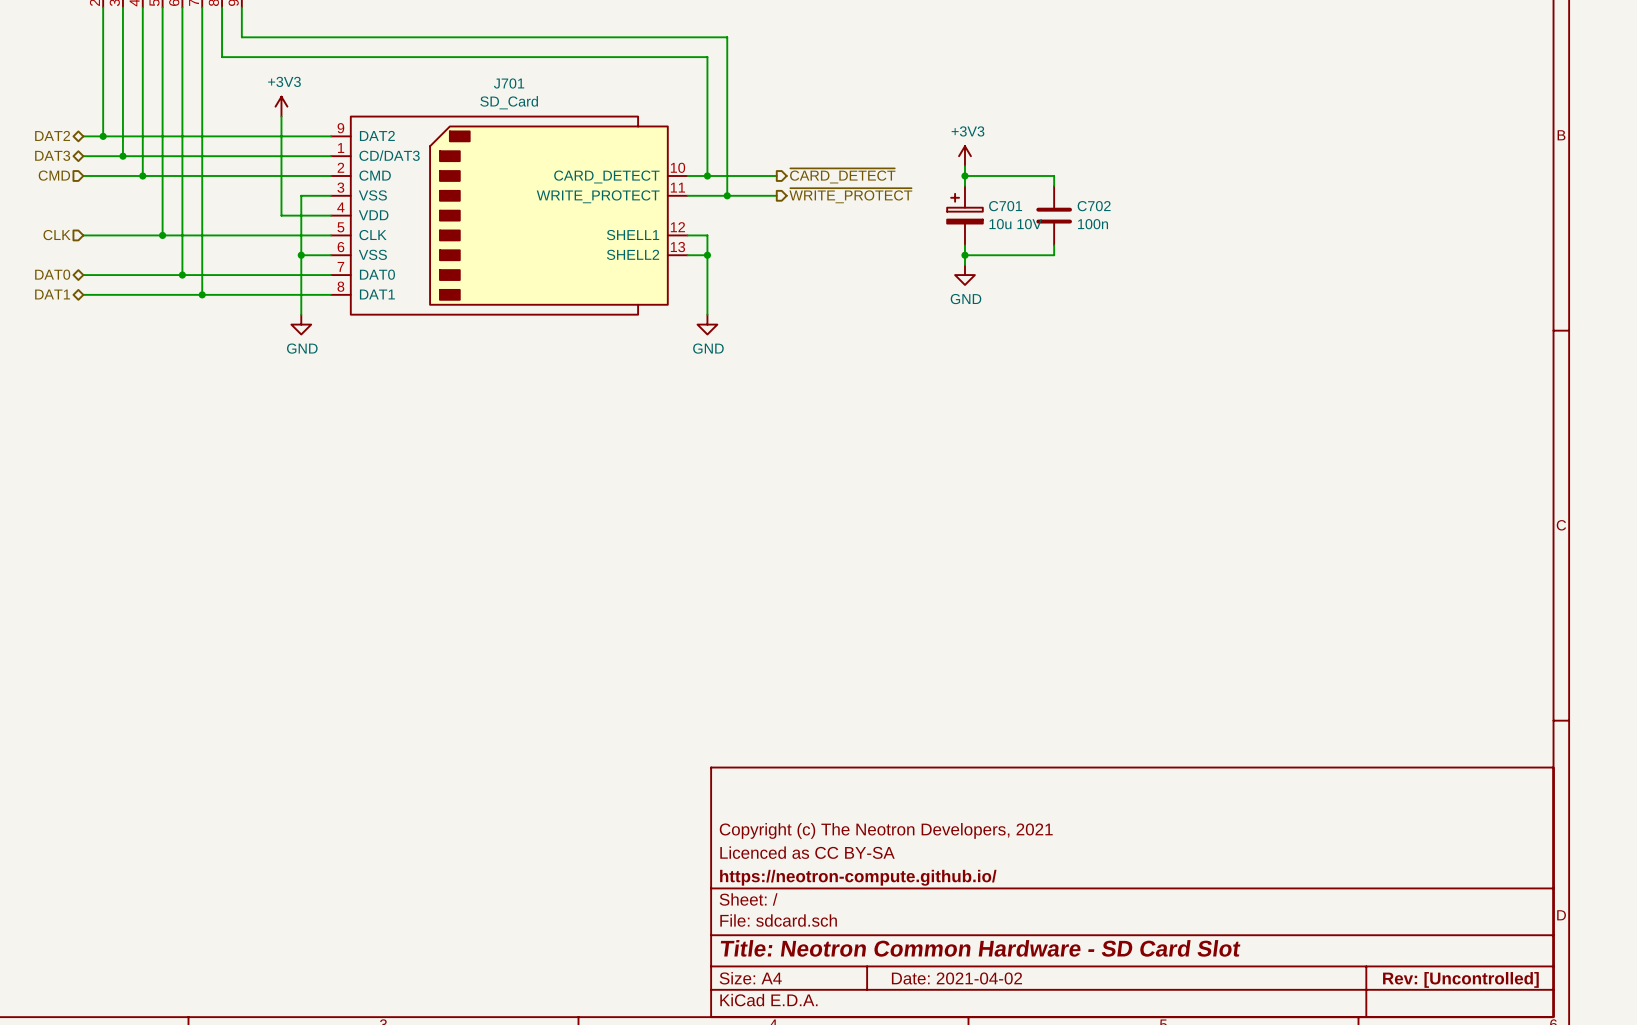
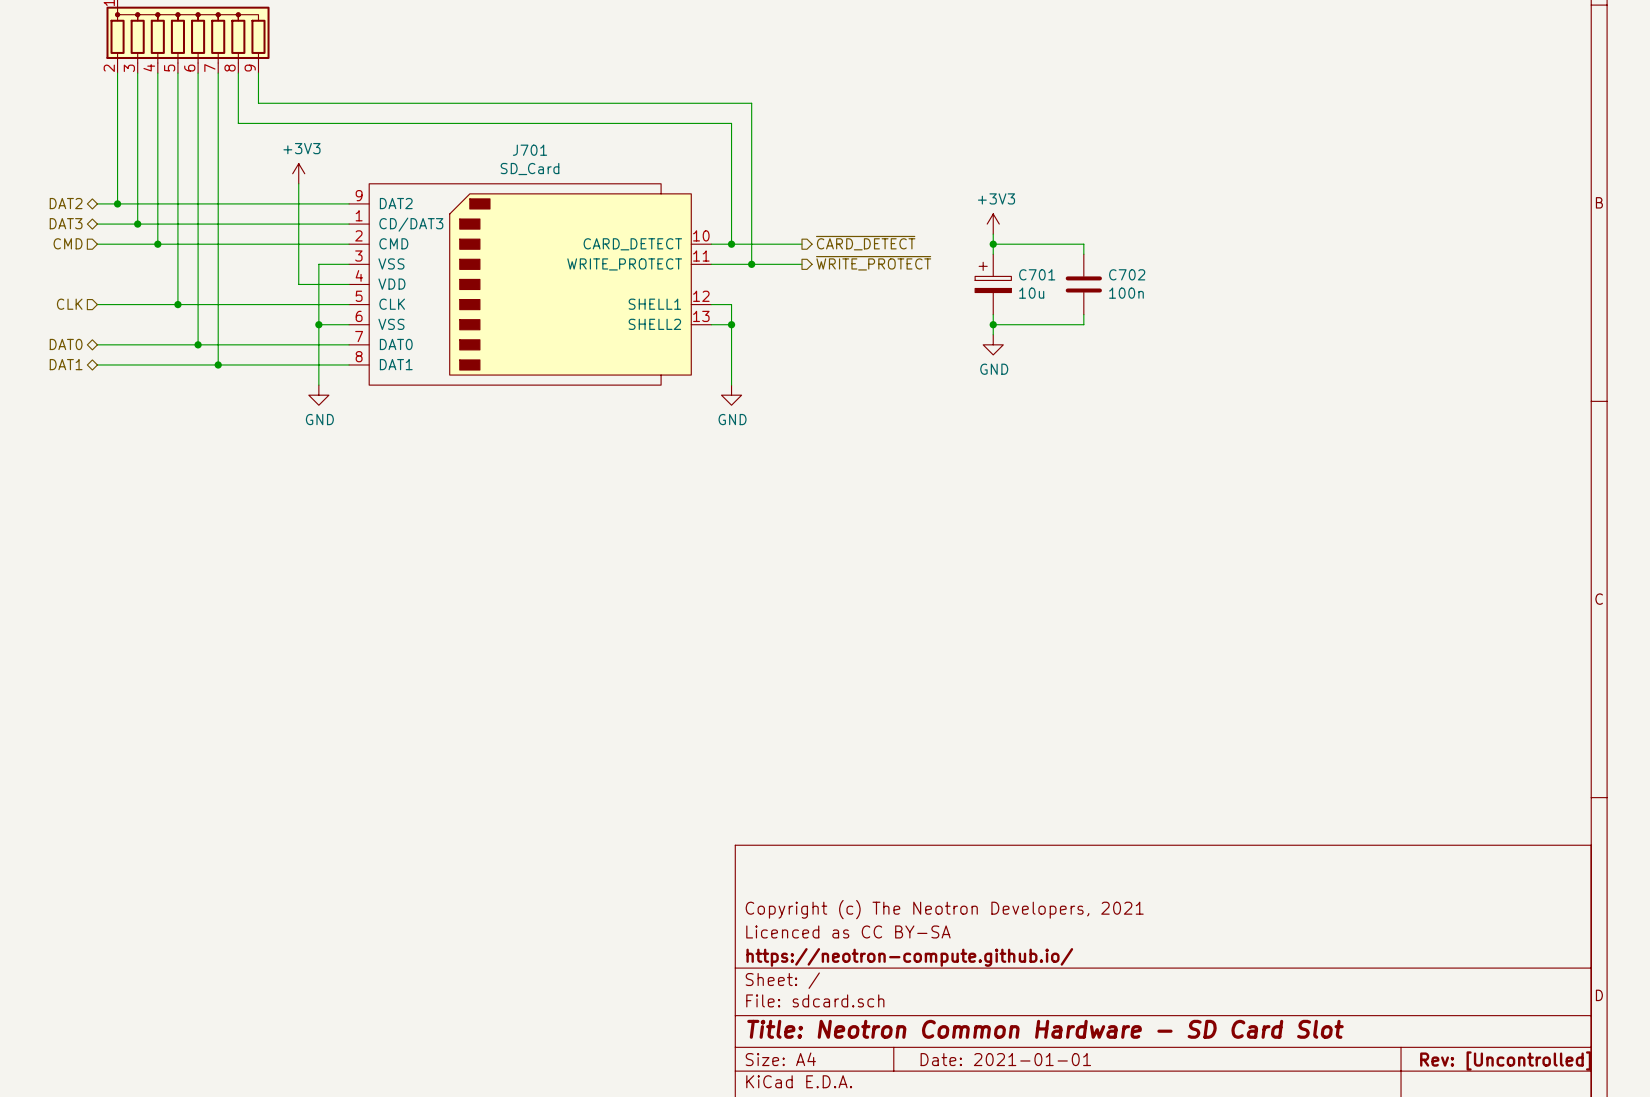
C701 value: 10u 10V (1015, 224) -> 10u (1031, 293)
title block: Date: 2021-04-02 (956, 978) -> Date: 2021-01-01 (1005, 1059)

